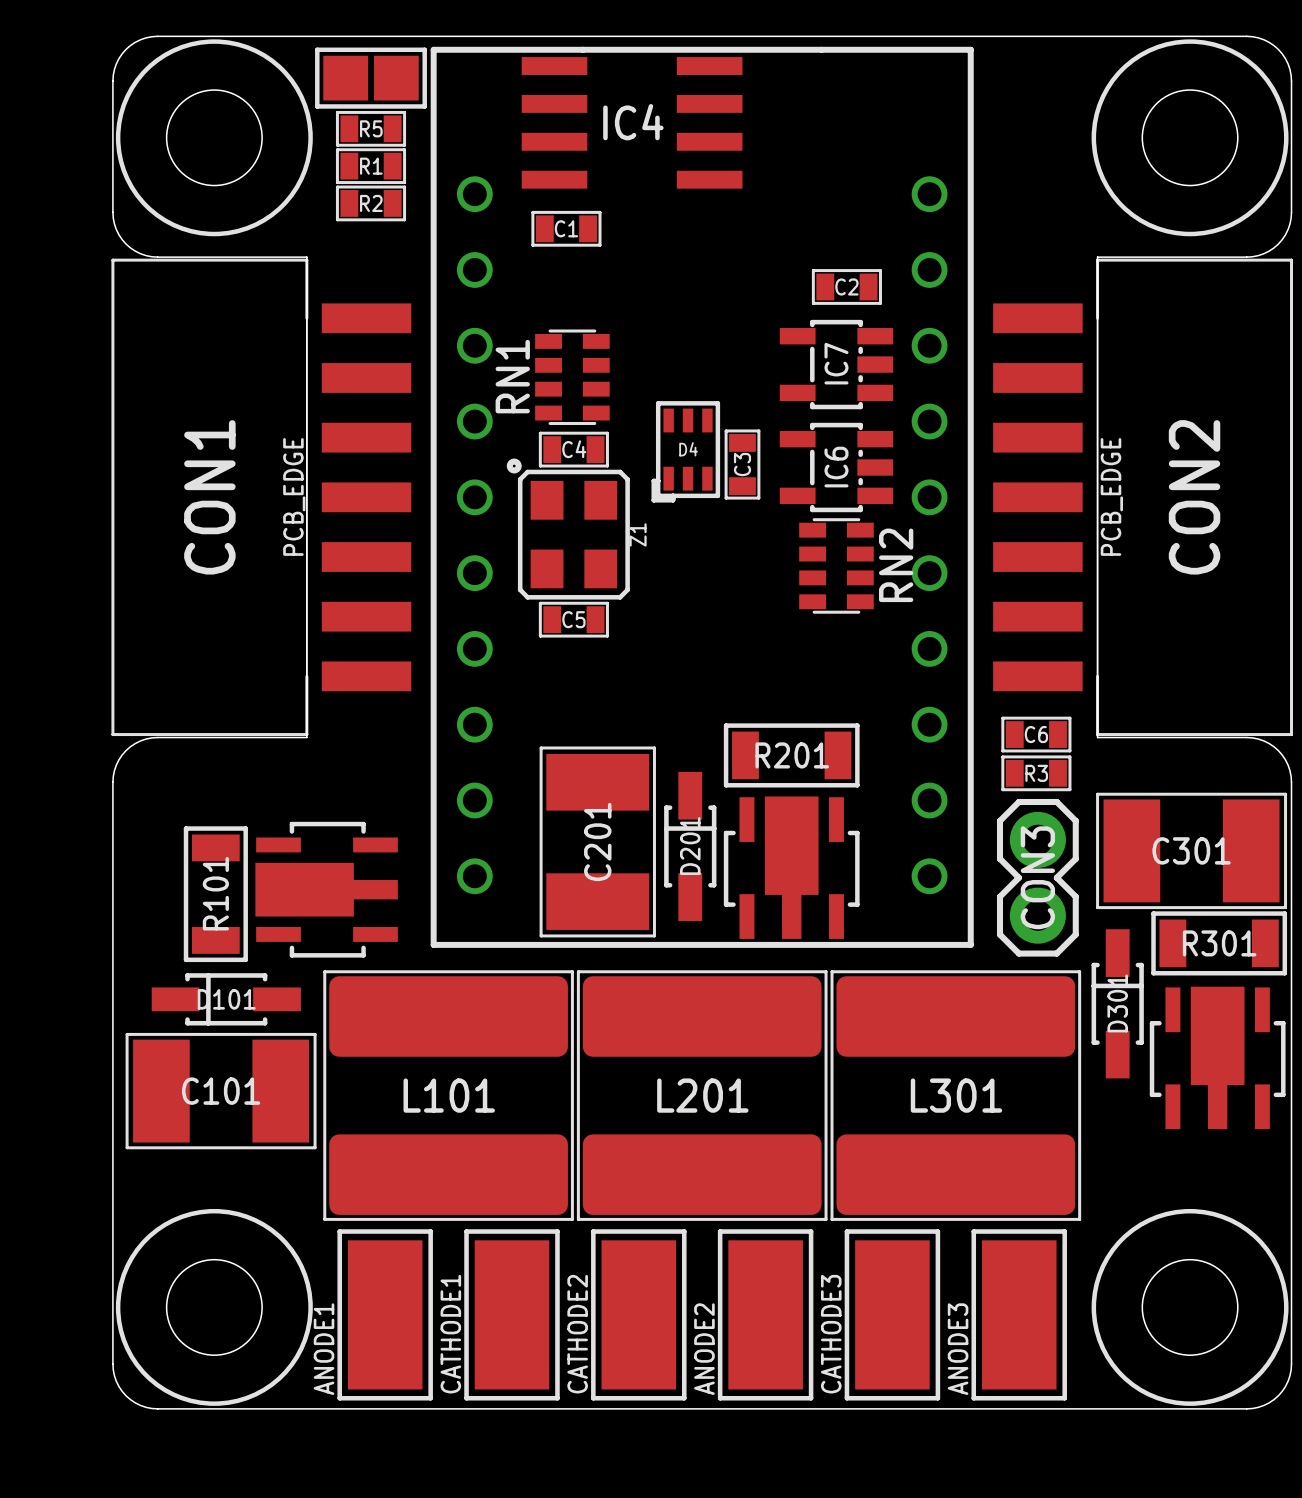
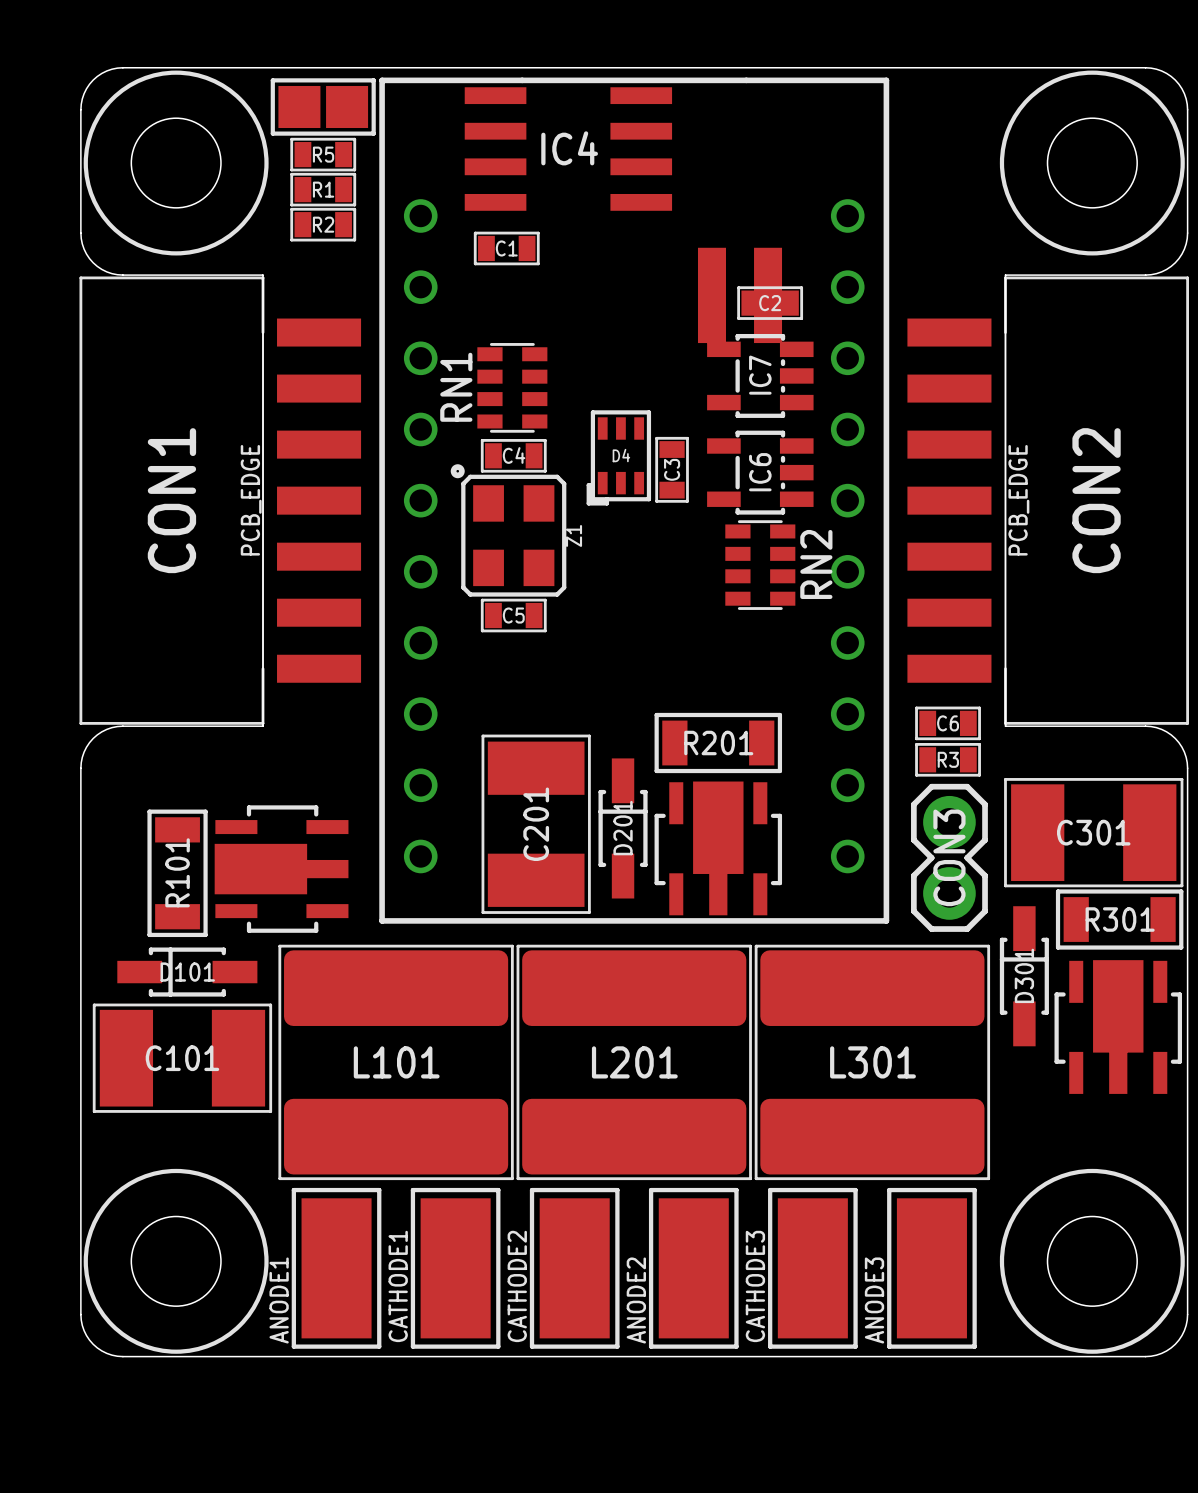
part: none -> (740, 295)

